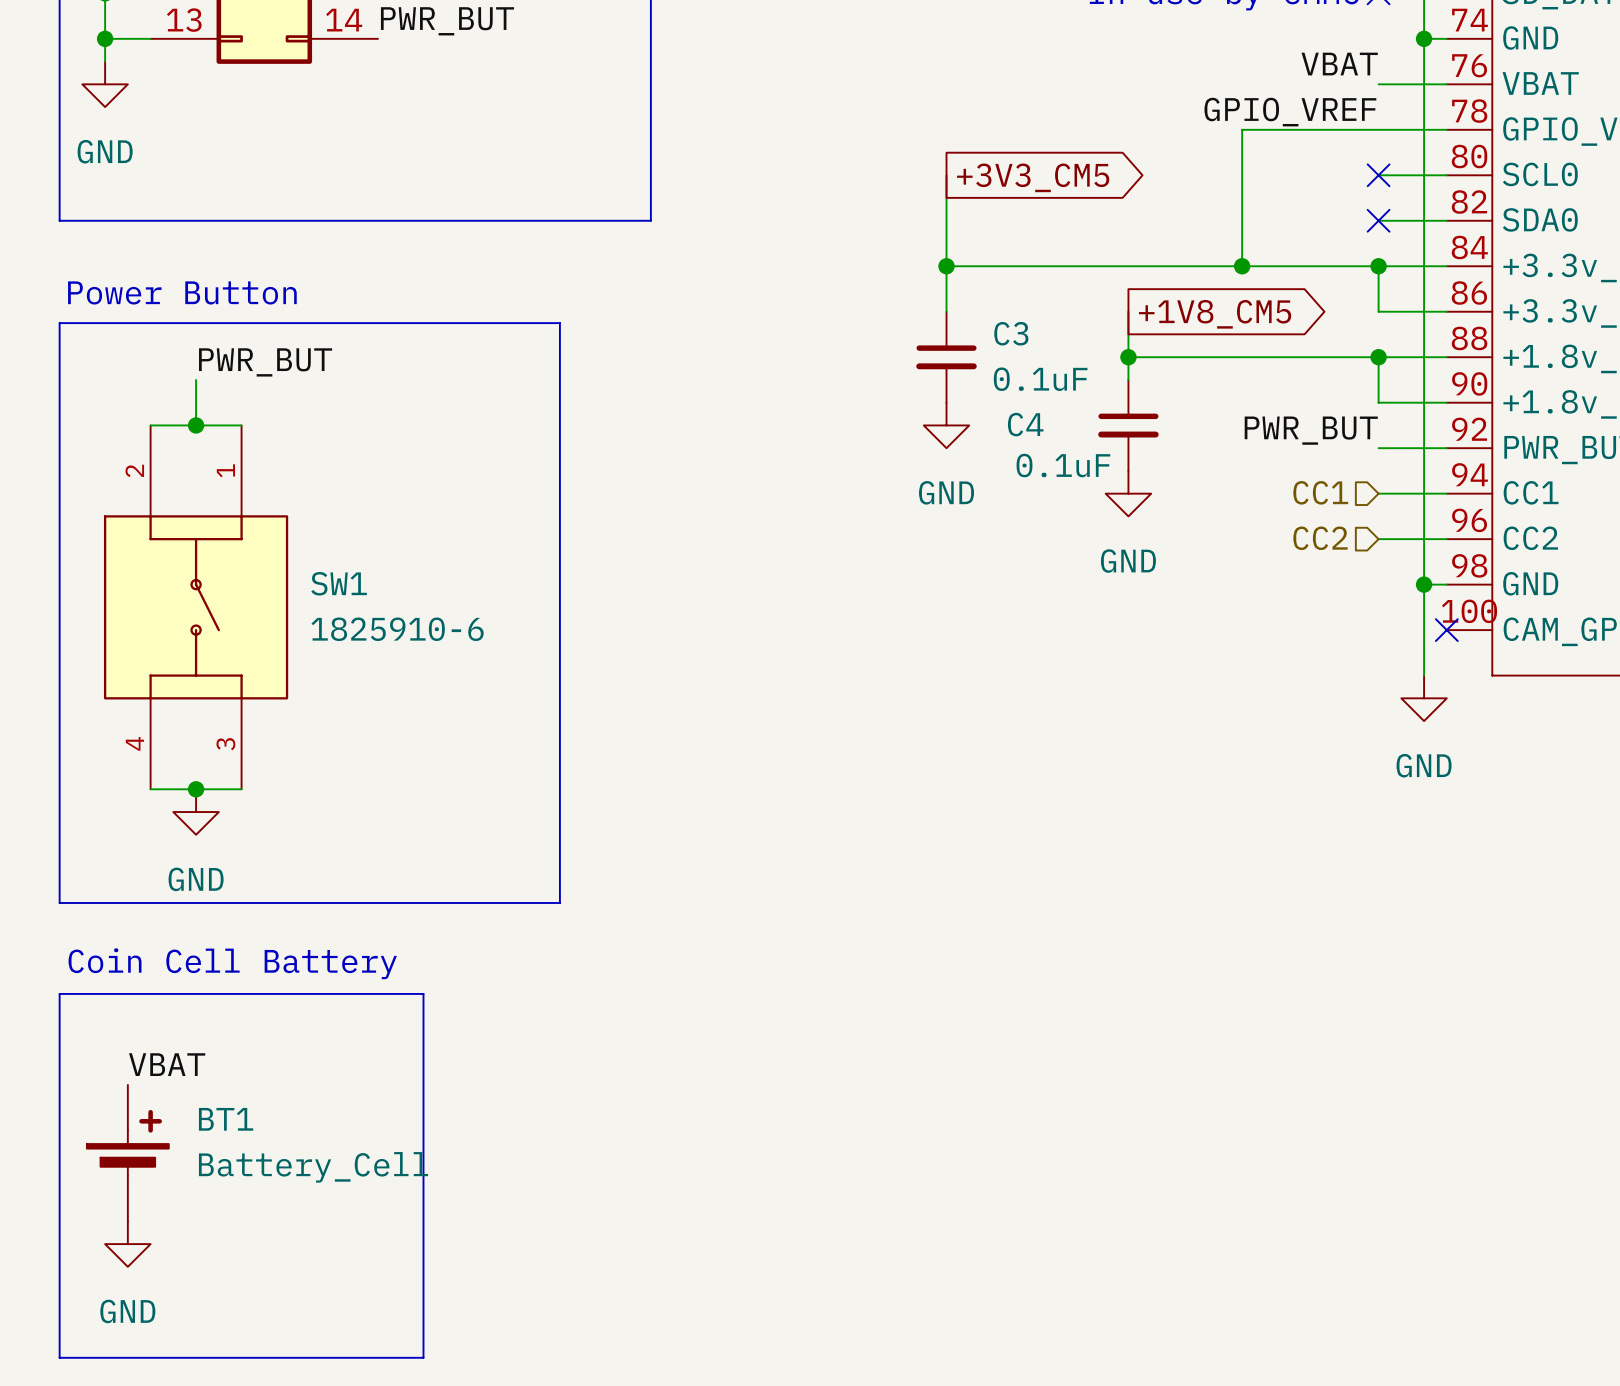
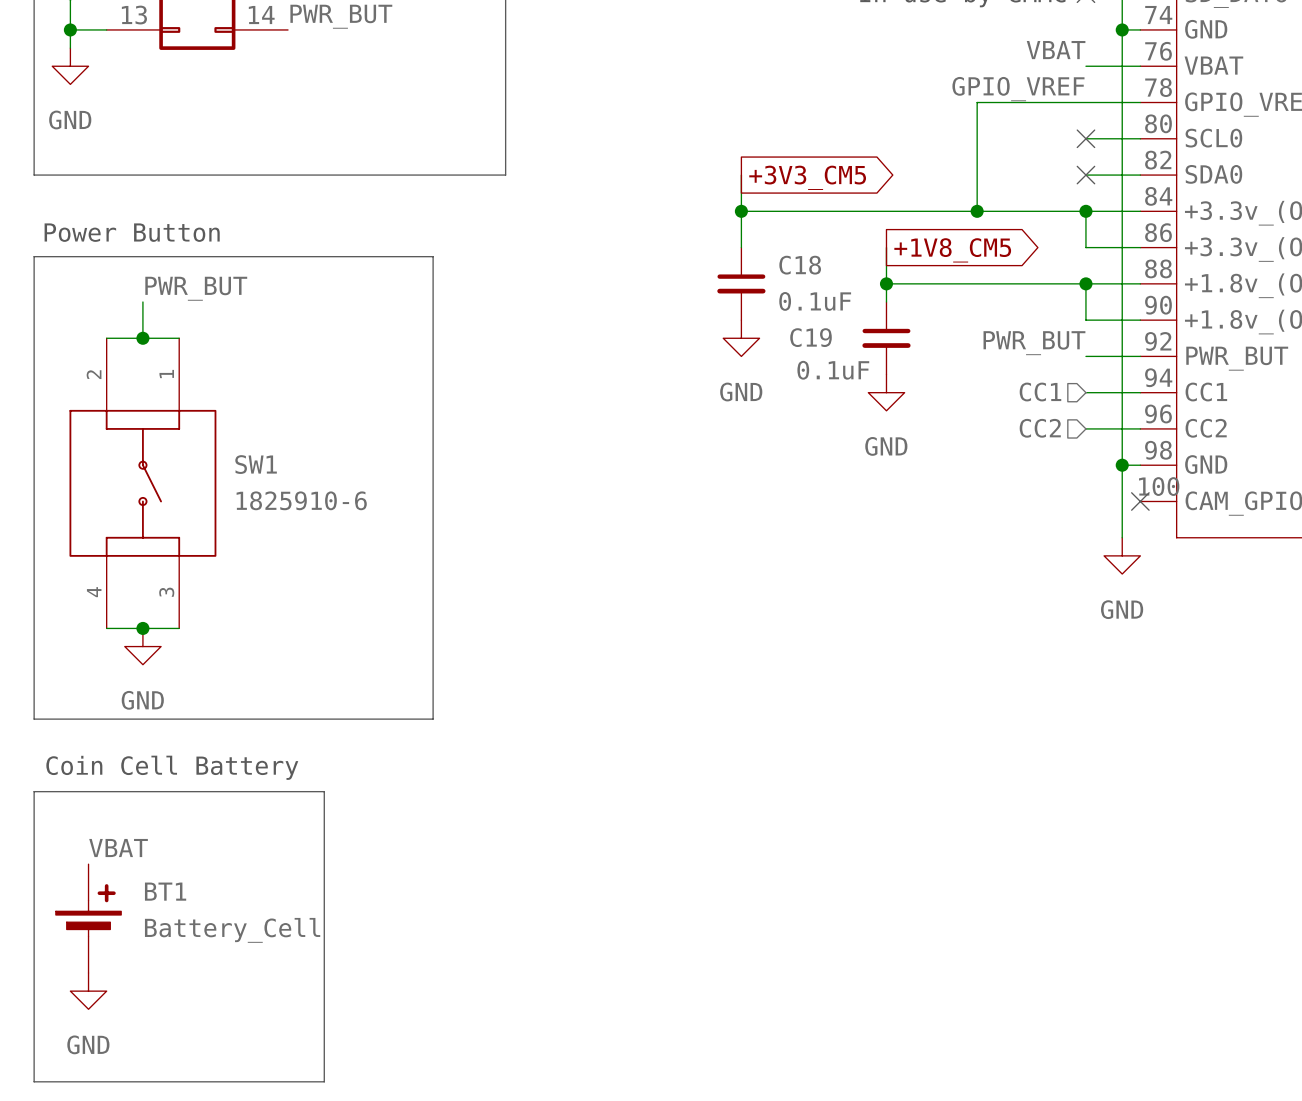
global label position: +3V3_CM5 (1033, 177) -> +3V3_CM5 (807, 177)
C3 name: C3 (1011, 333) -> C18 (800, 265)
C4 name: C4 (1025, 424) -> C19 (811, 337)

